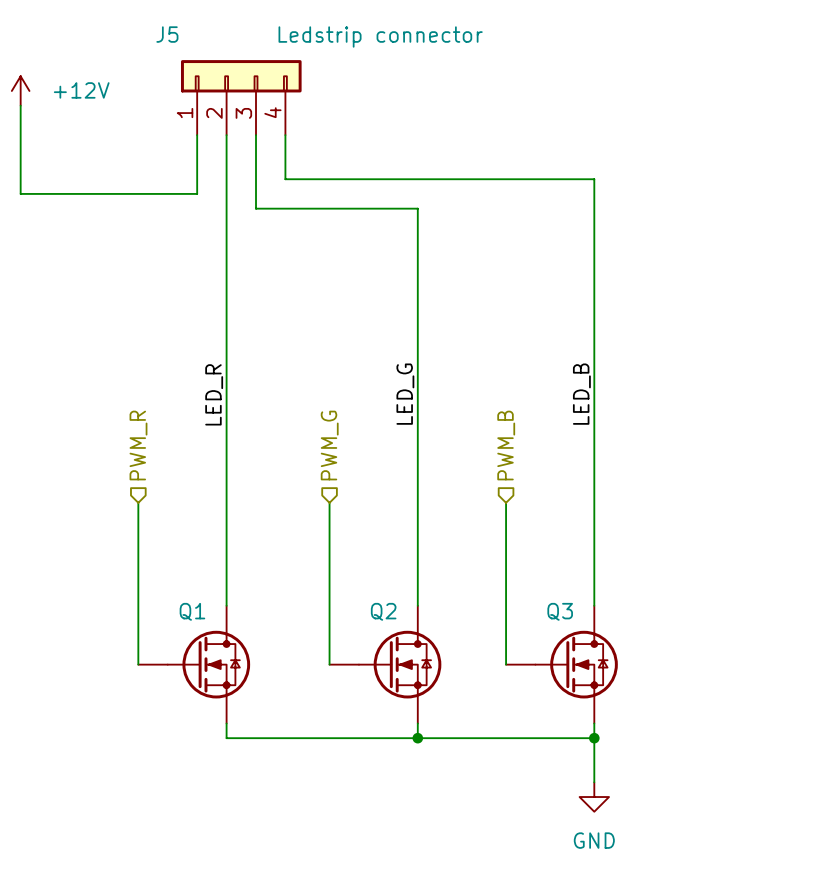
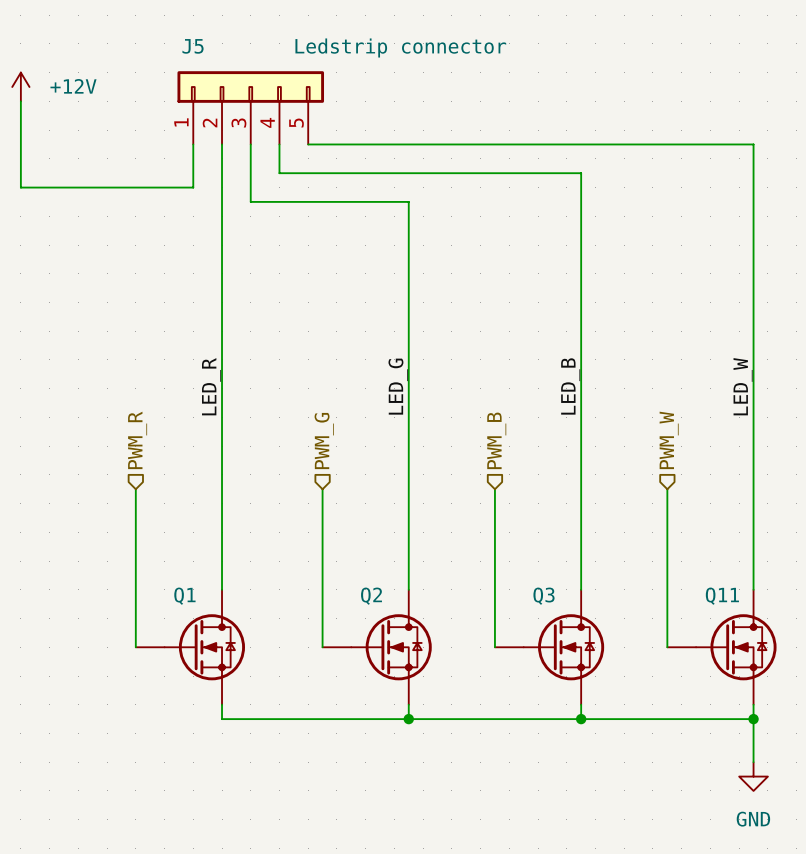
J5 symbol: [180, 60, 302, 136] -> [177, 71, 325, 145]
wire: none -> (308, 144) (753, 144) (753, 589)
label: none -> LED_W (743, 386)
hierarchical label: none -> PWM_W (669, 440)
wire: none -> (667, 489) (667, 647)
Q11: none -> (721, 647)
wire: none -> (753, 704) (753, 762)
wire: (594, 738) (594, 782) -> (581, 719) (753, 719)
junction: none -> (753, 719)
power symbol position: GND (594, 797) -> GND (753, 776)

